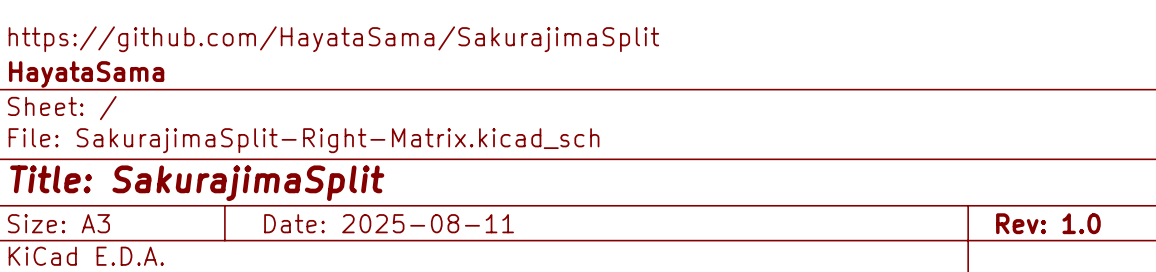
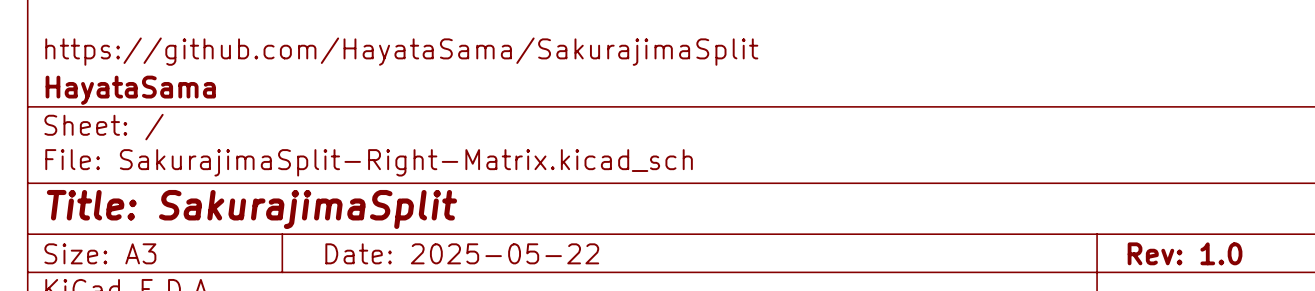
title block: Date: 2025-08-11 (389, 223) -> Date: 2025-05-22 (462, 253)

